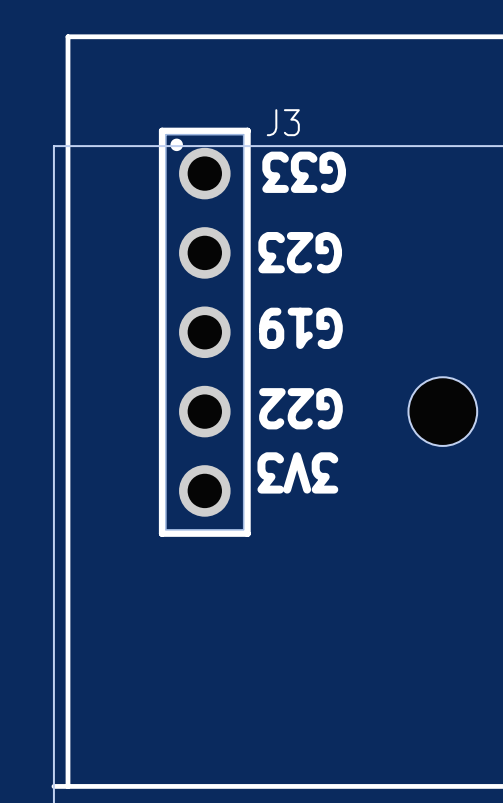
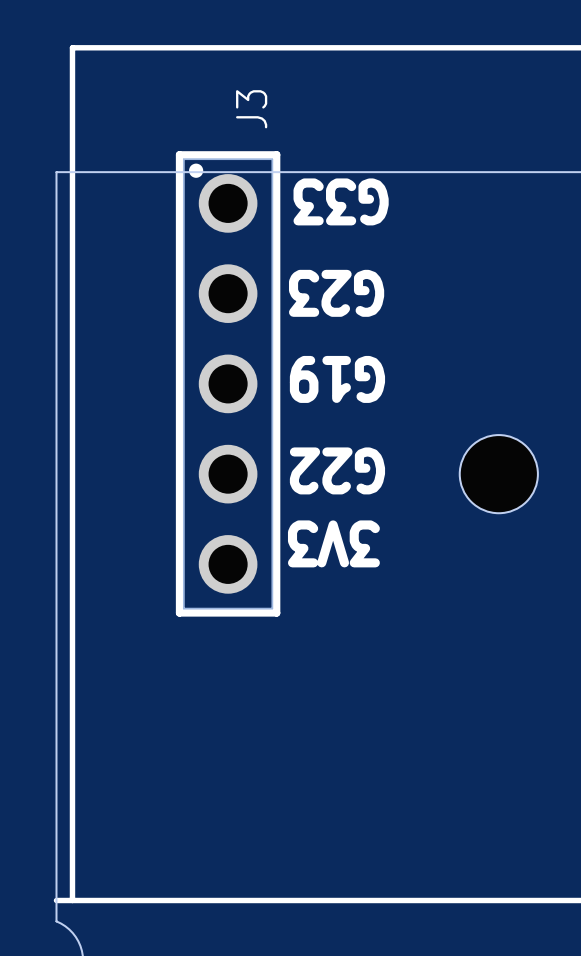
J3 name rotation: 0° (283, 122) -> 90° counterclockwise (251, 109)
J3 name position: J3 (283, 122) -> J3 (251, 109)

